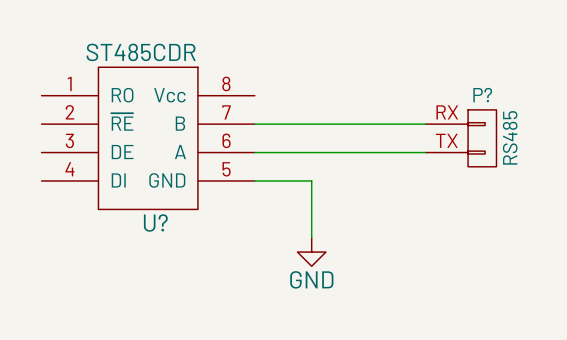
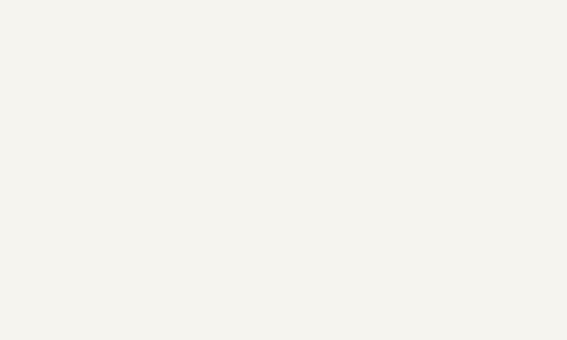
wire: (254, 124) (425, 124) -> none
U?: ST485CDR (148, 138) -> none
P?: RS485 (460, 138) -> none
wire: (254, 152) (425, 152) -> none
wire: (254, 180) (311, 180) (311, 237) -> none
power symbol: GND (311, 252) -> none

